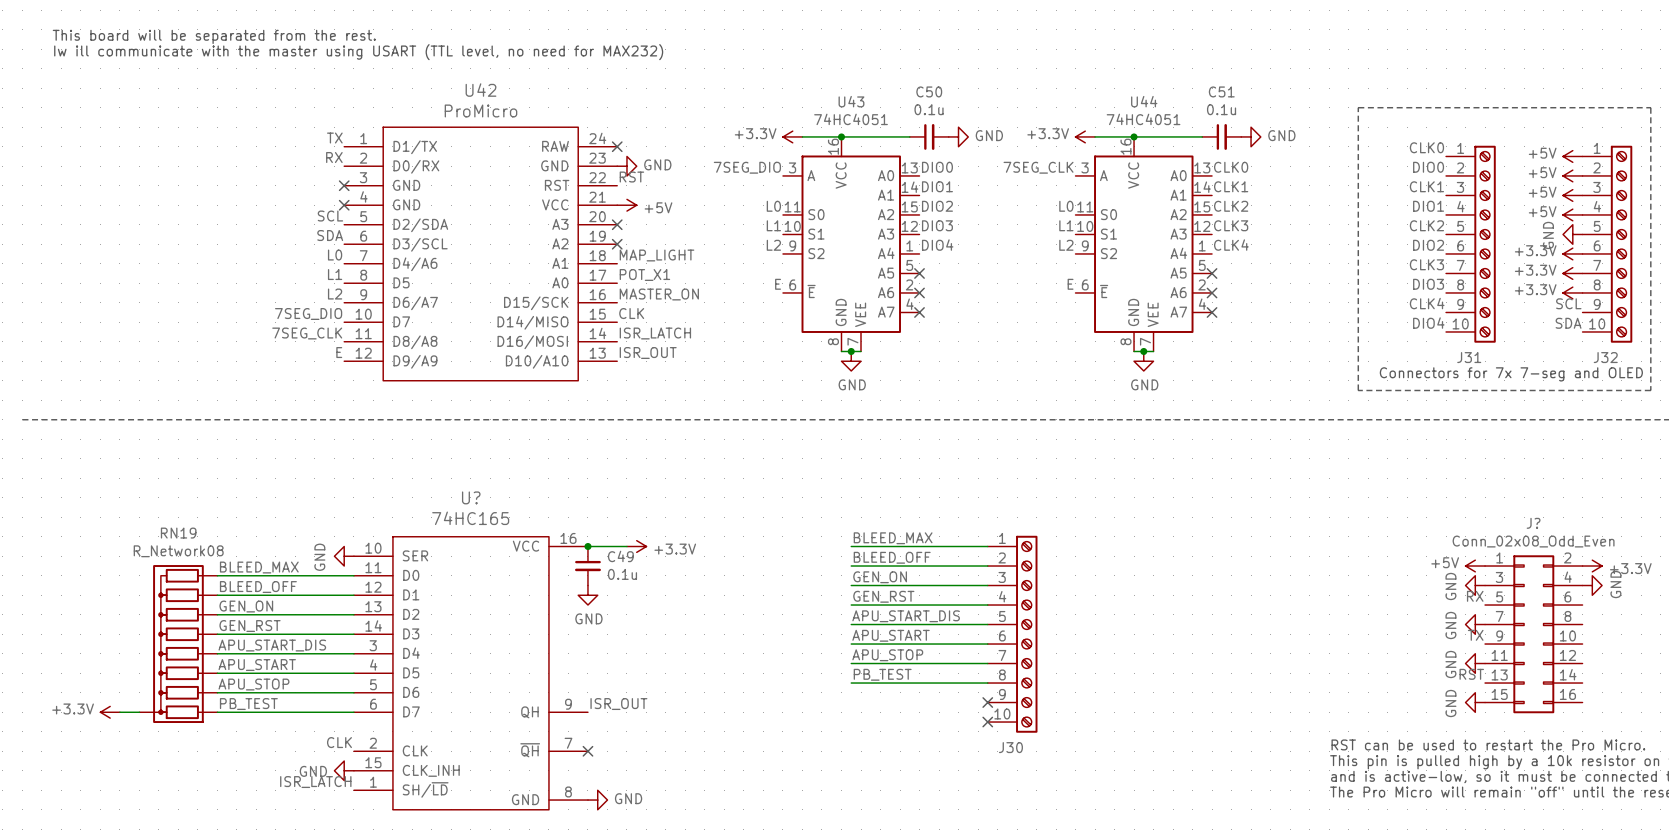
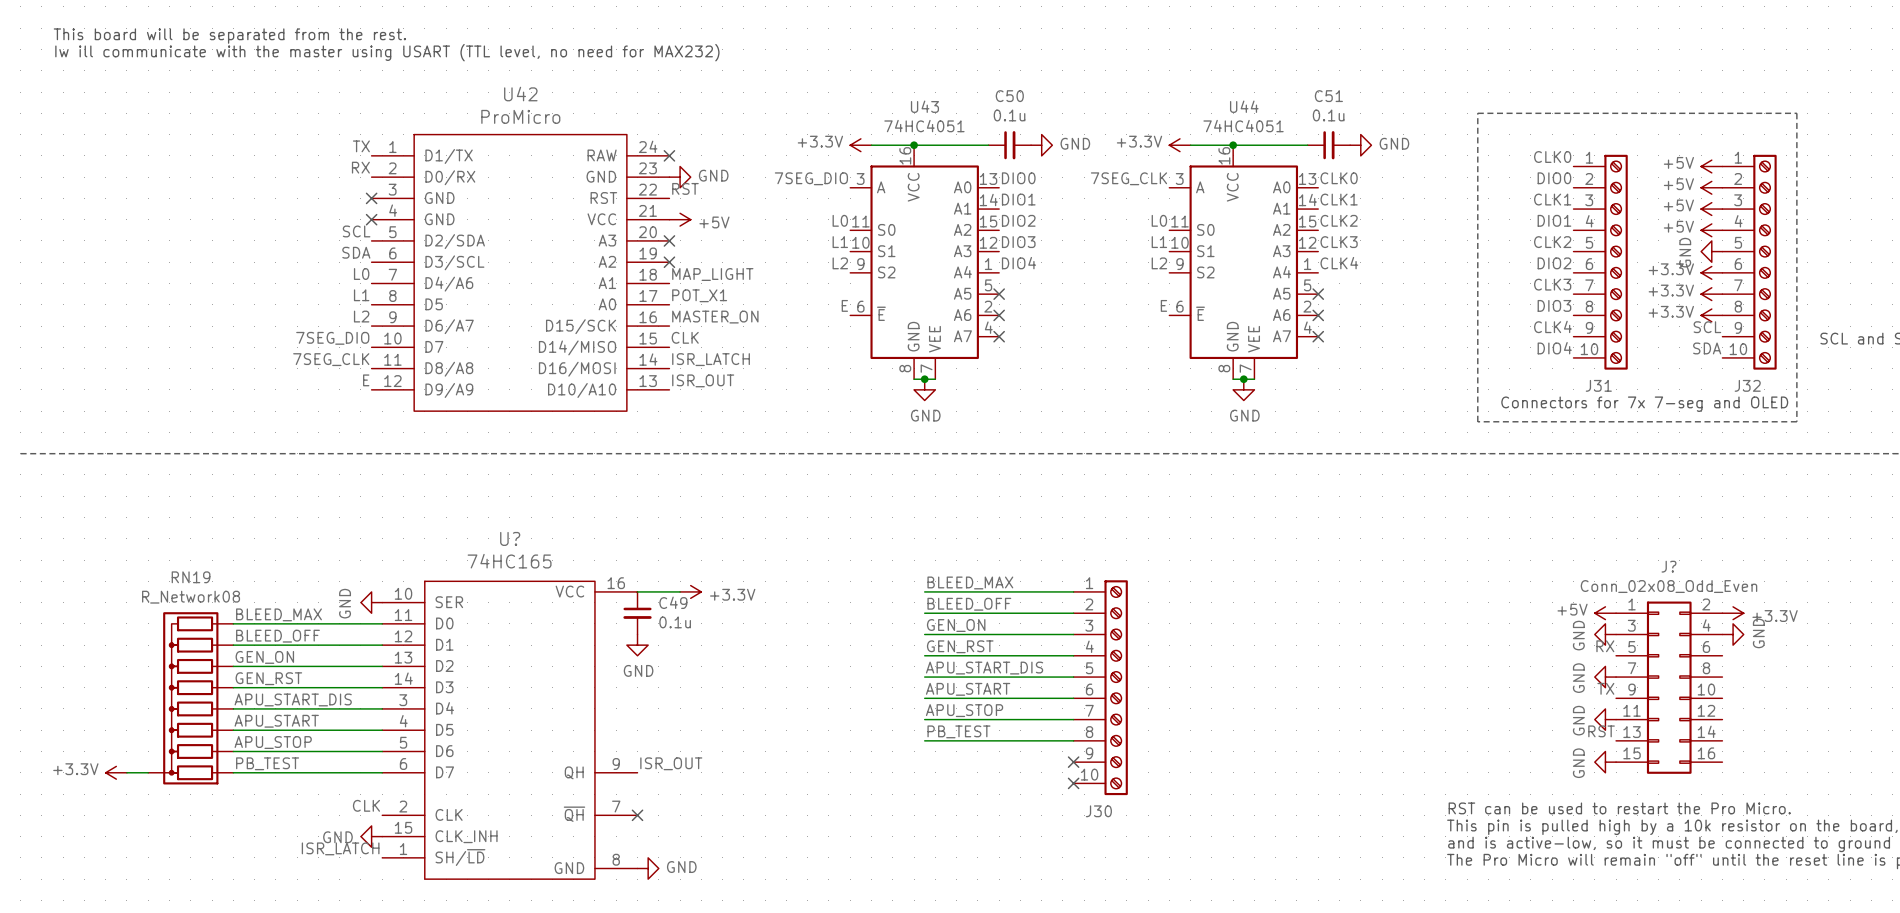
junction: (587, 546) -> none

